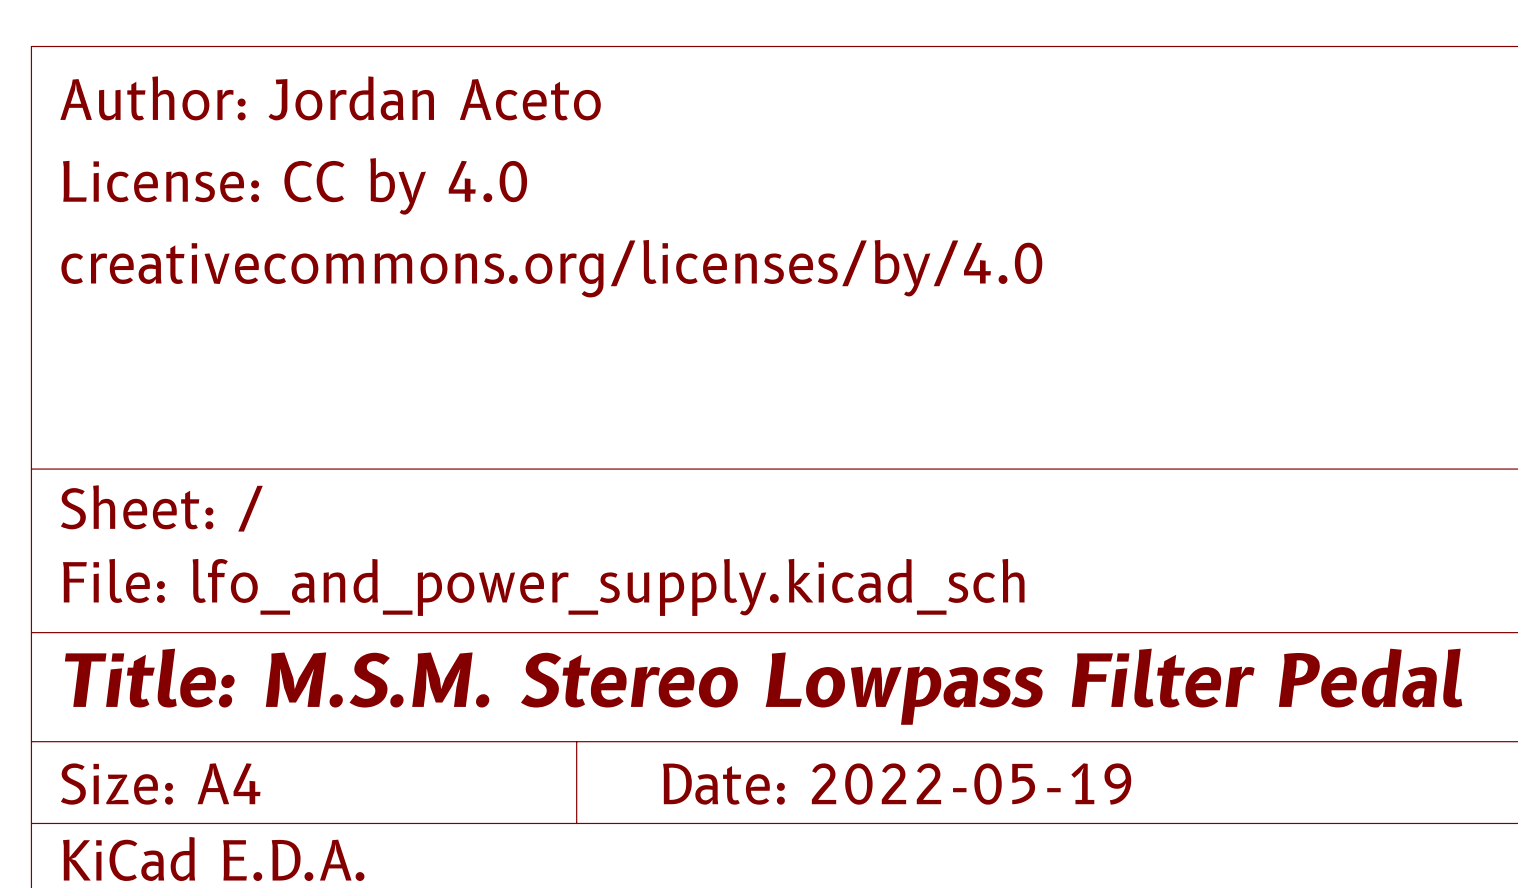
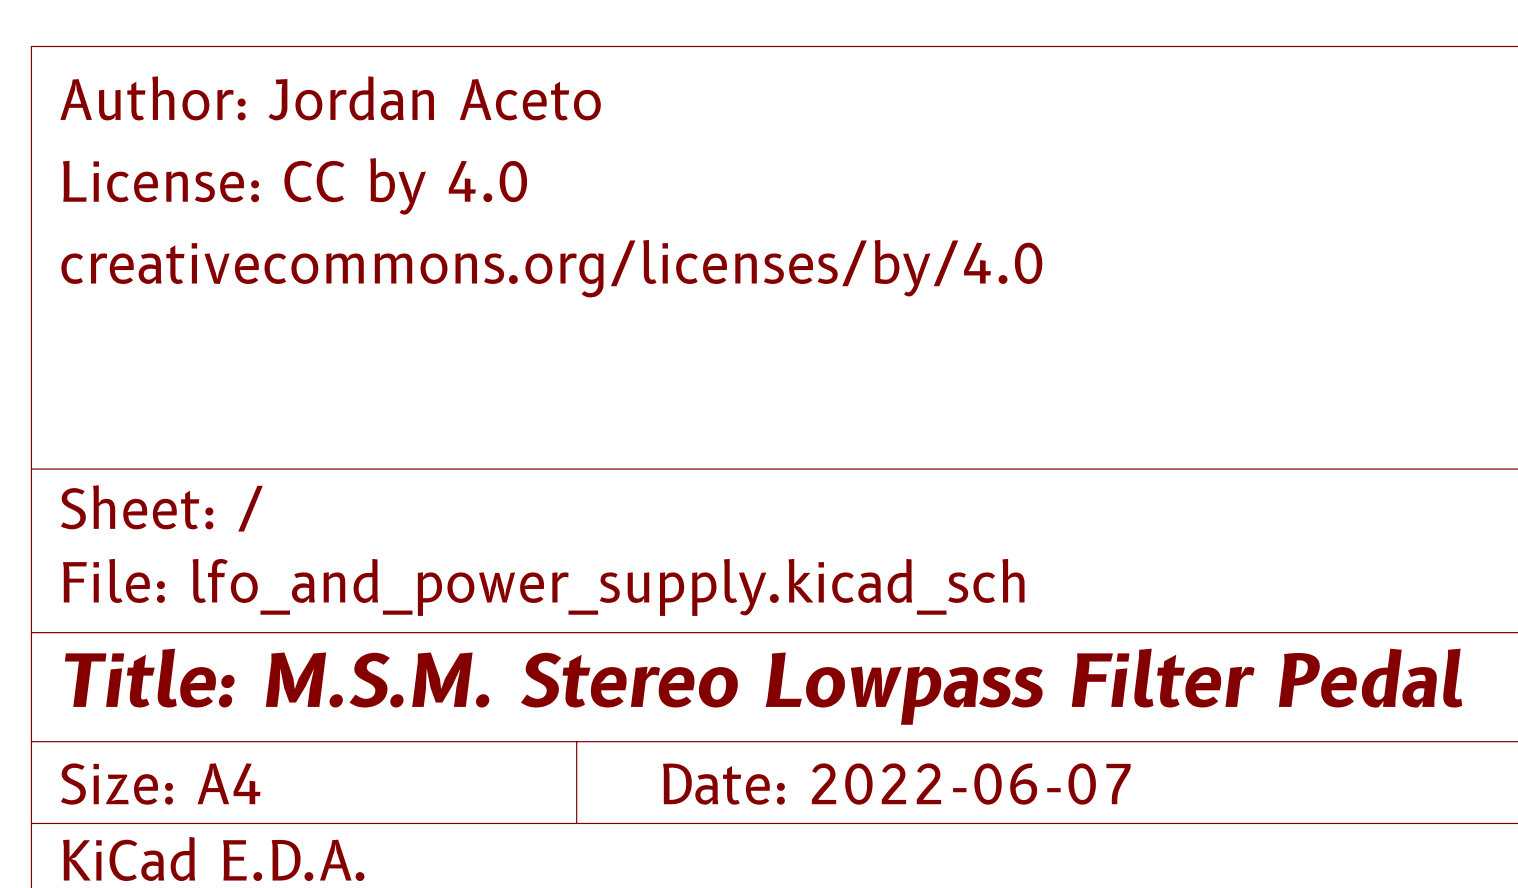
title block: Date: 2022-05-19 (897, 784) -> Date: 2022-06-07 (896, 784)

